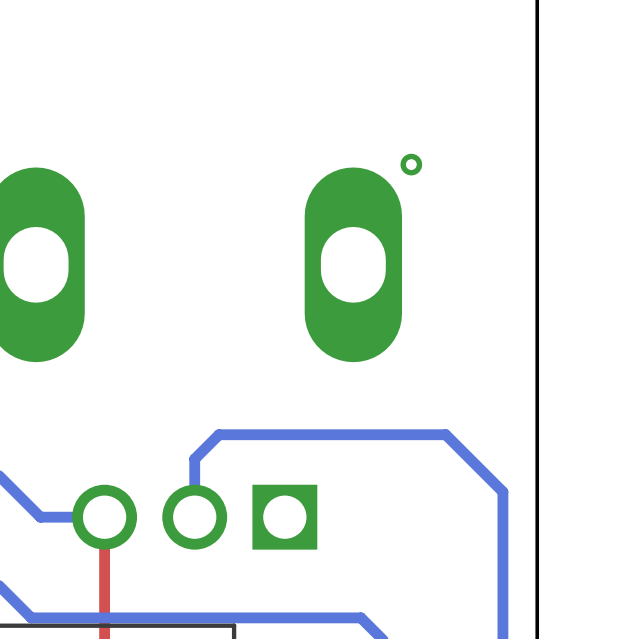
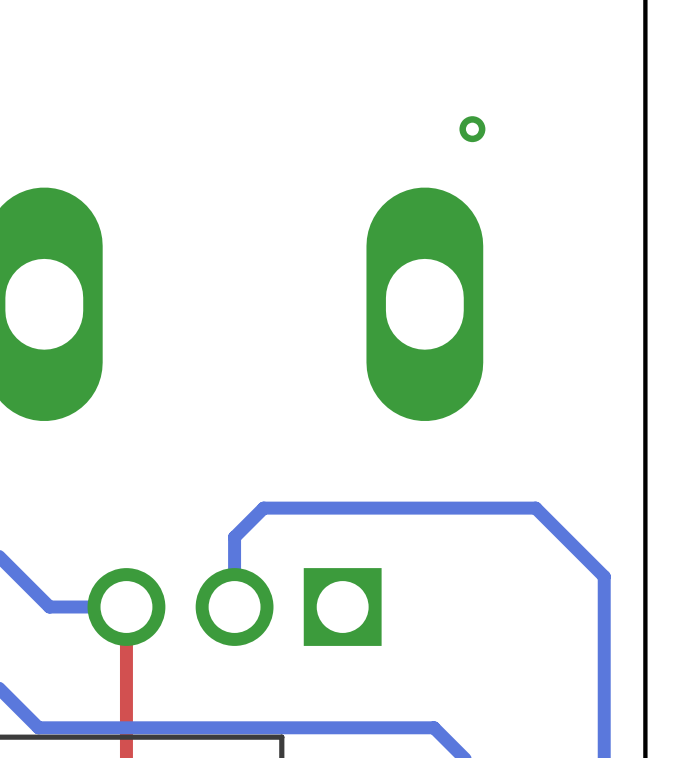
via position: (411, 164) -> (472, 129)

